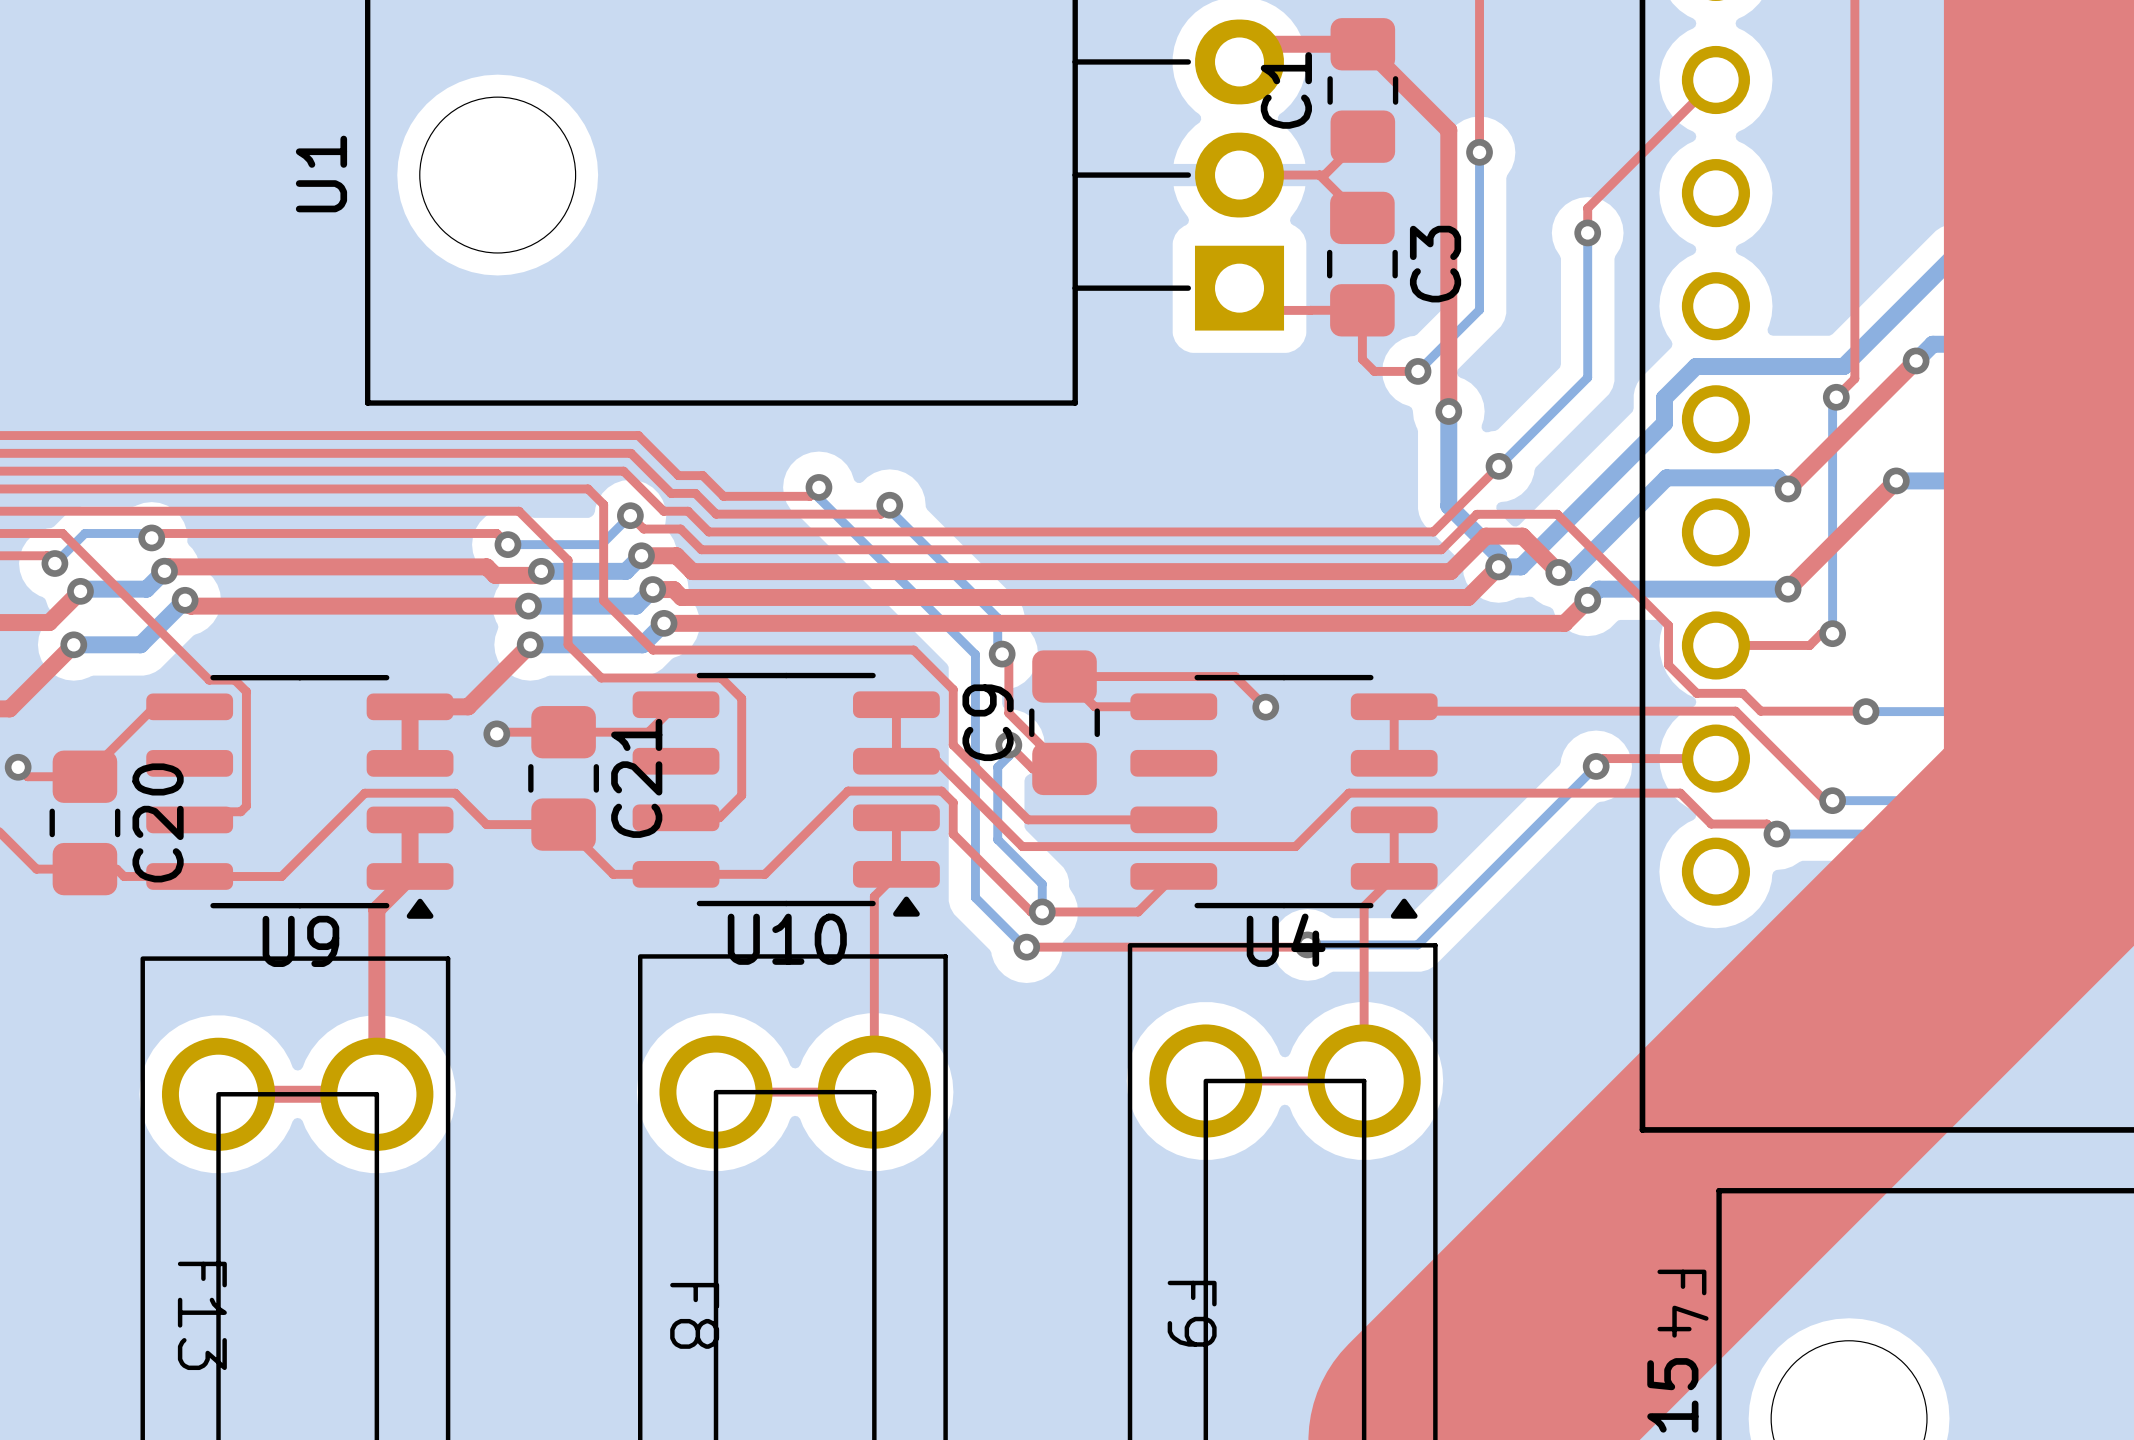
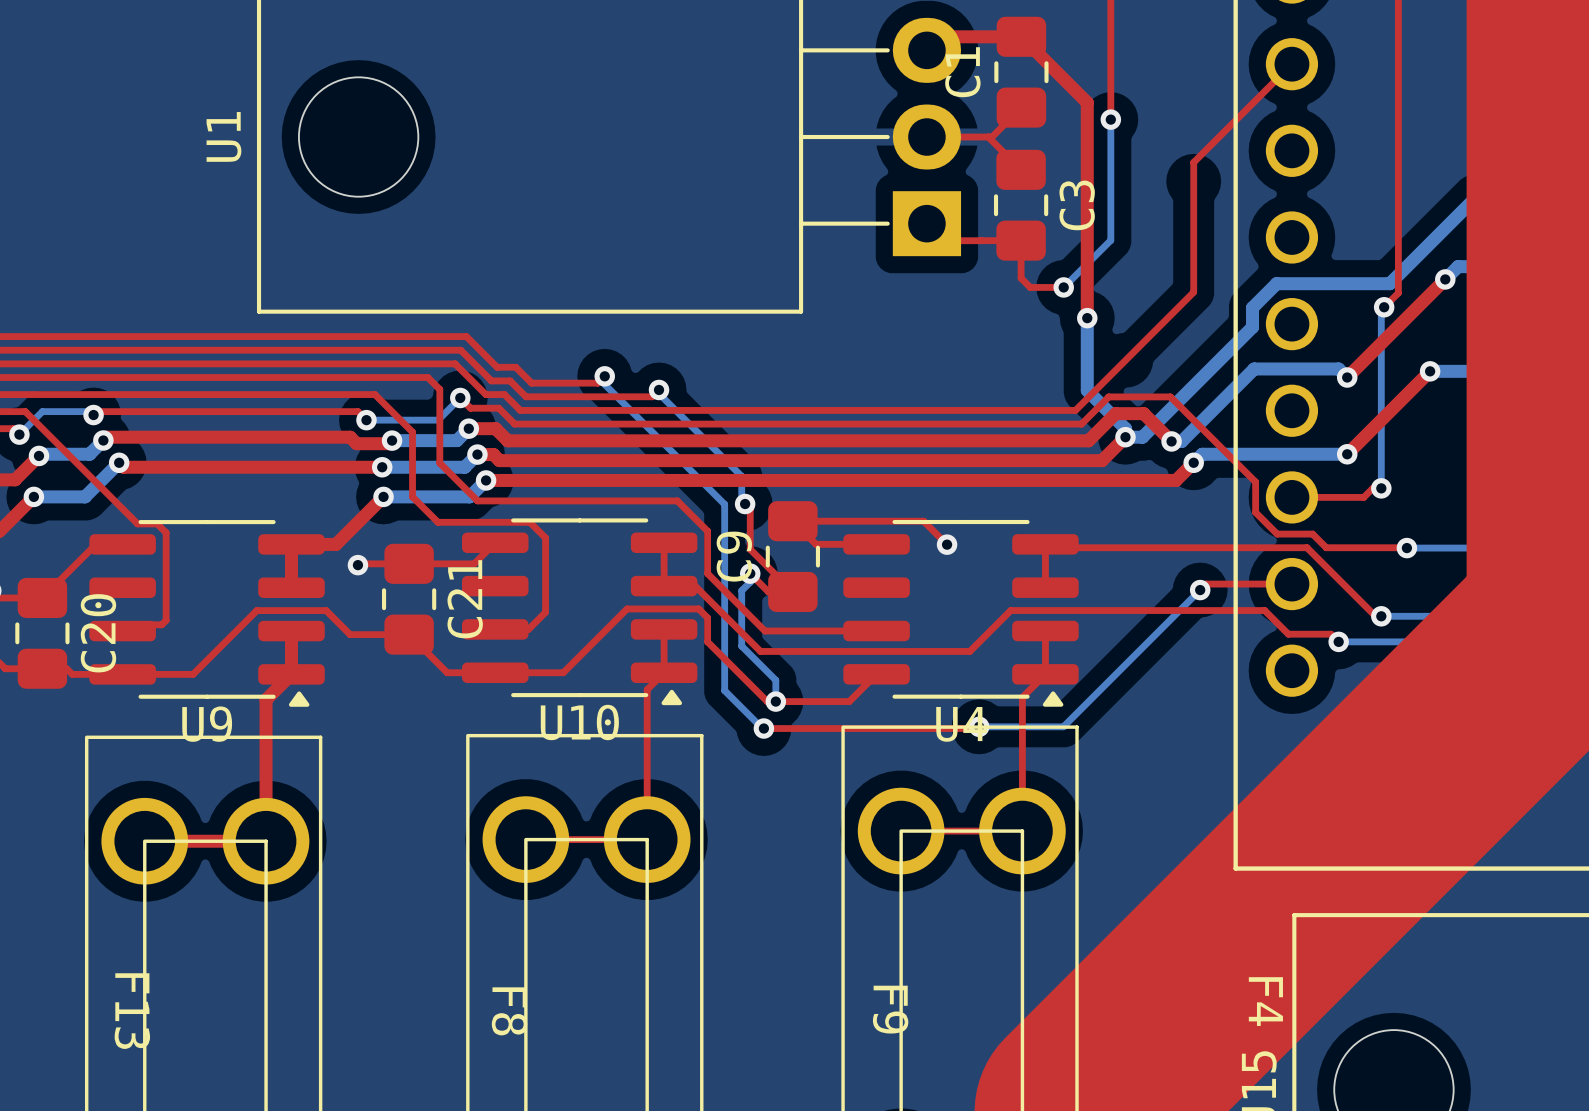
top track: none -> (1193, 181) (1193, 292) (1125, 360)
bottom track: (1587, 232) (1587, 377) (1499, 466) -> none
via: (1587, 232) -> none
via: (1499, 466) -> none

